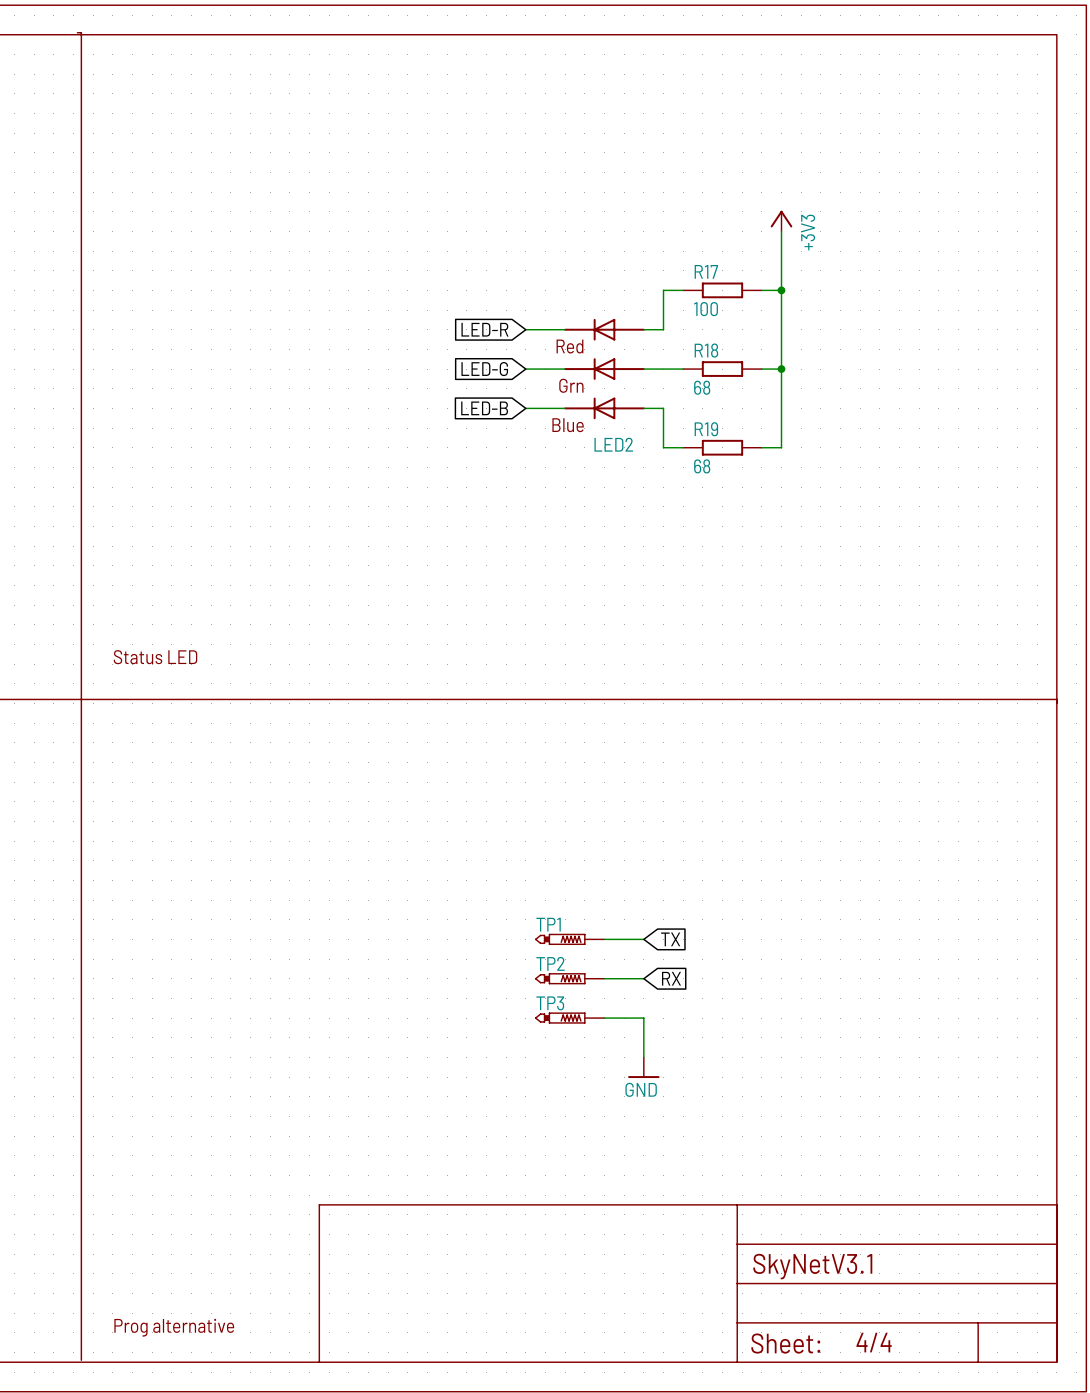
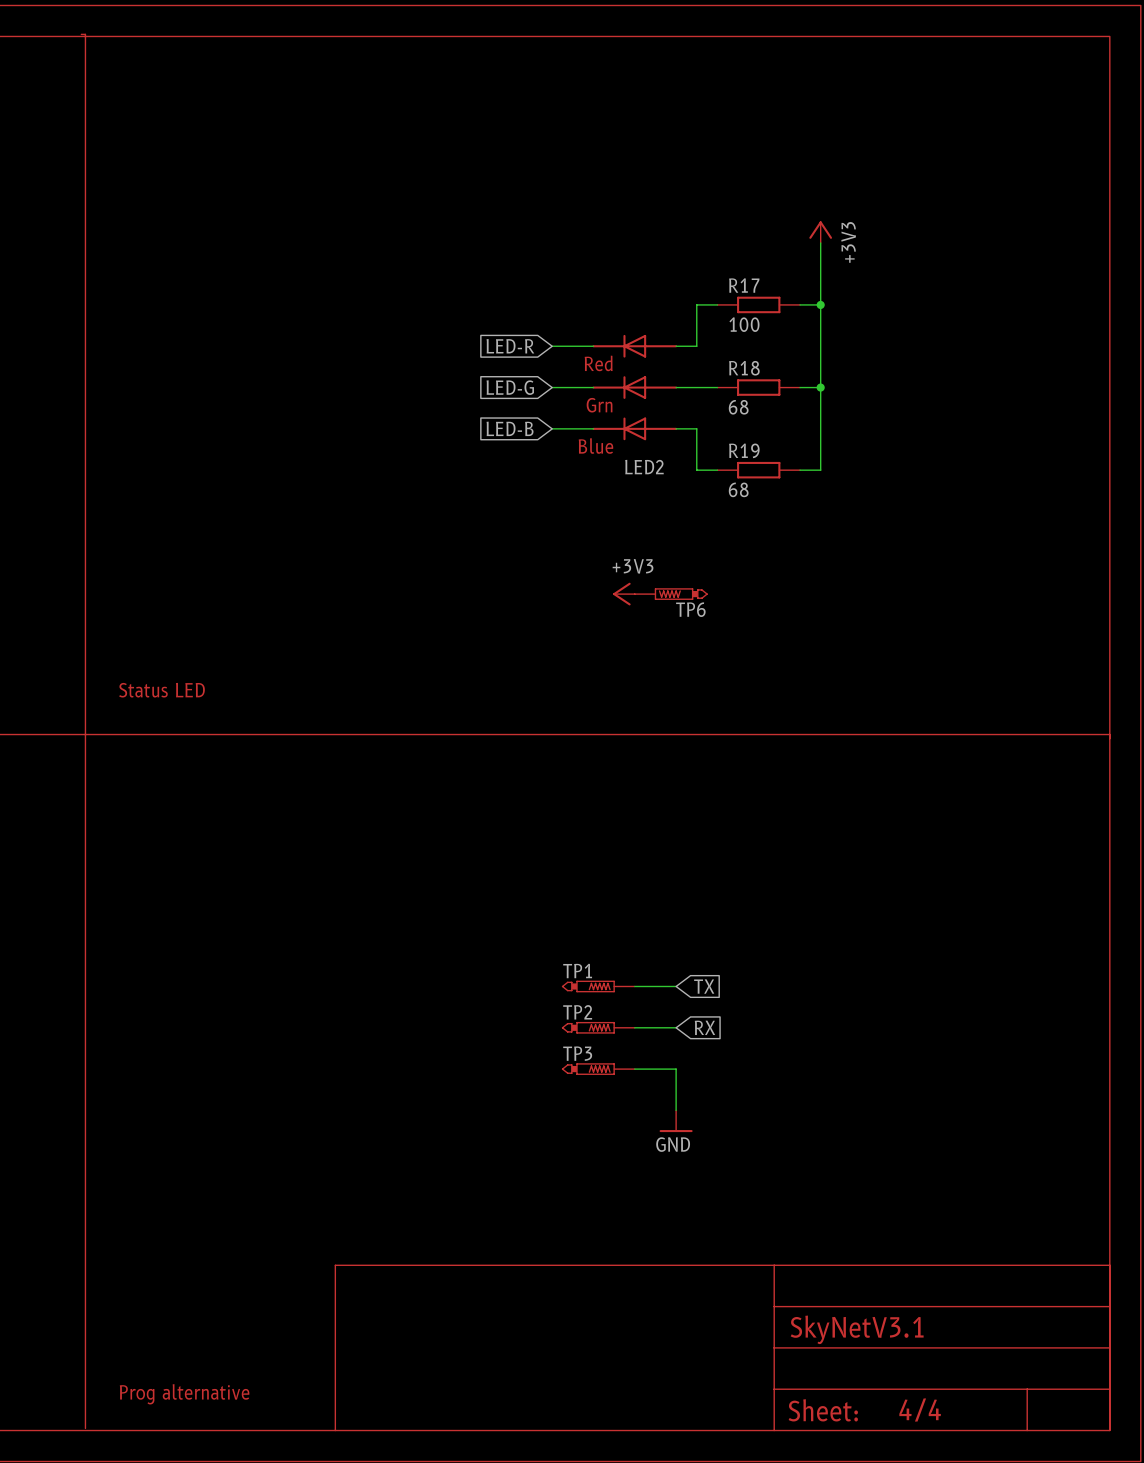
power symbol: none -> +3V3 (623, 594)
TP6: none -> (671, 594)

